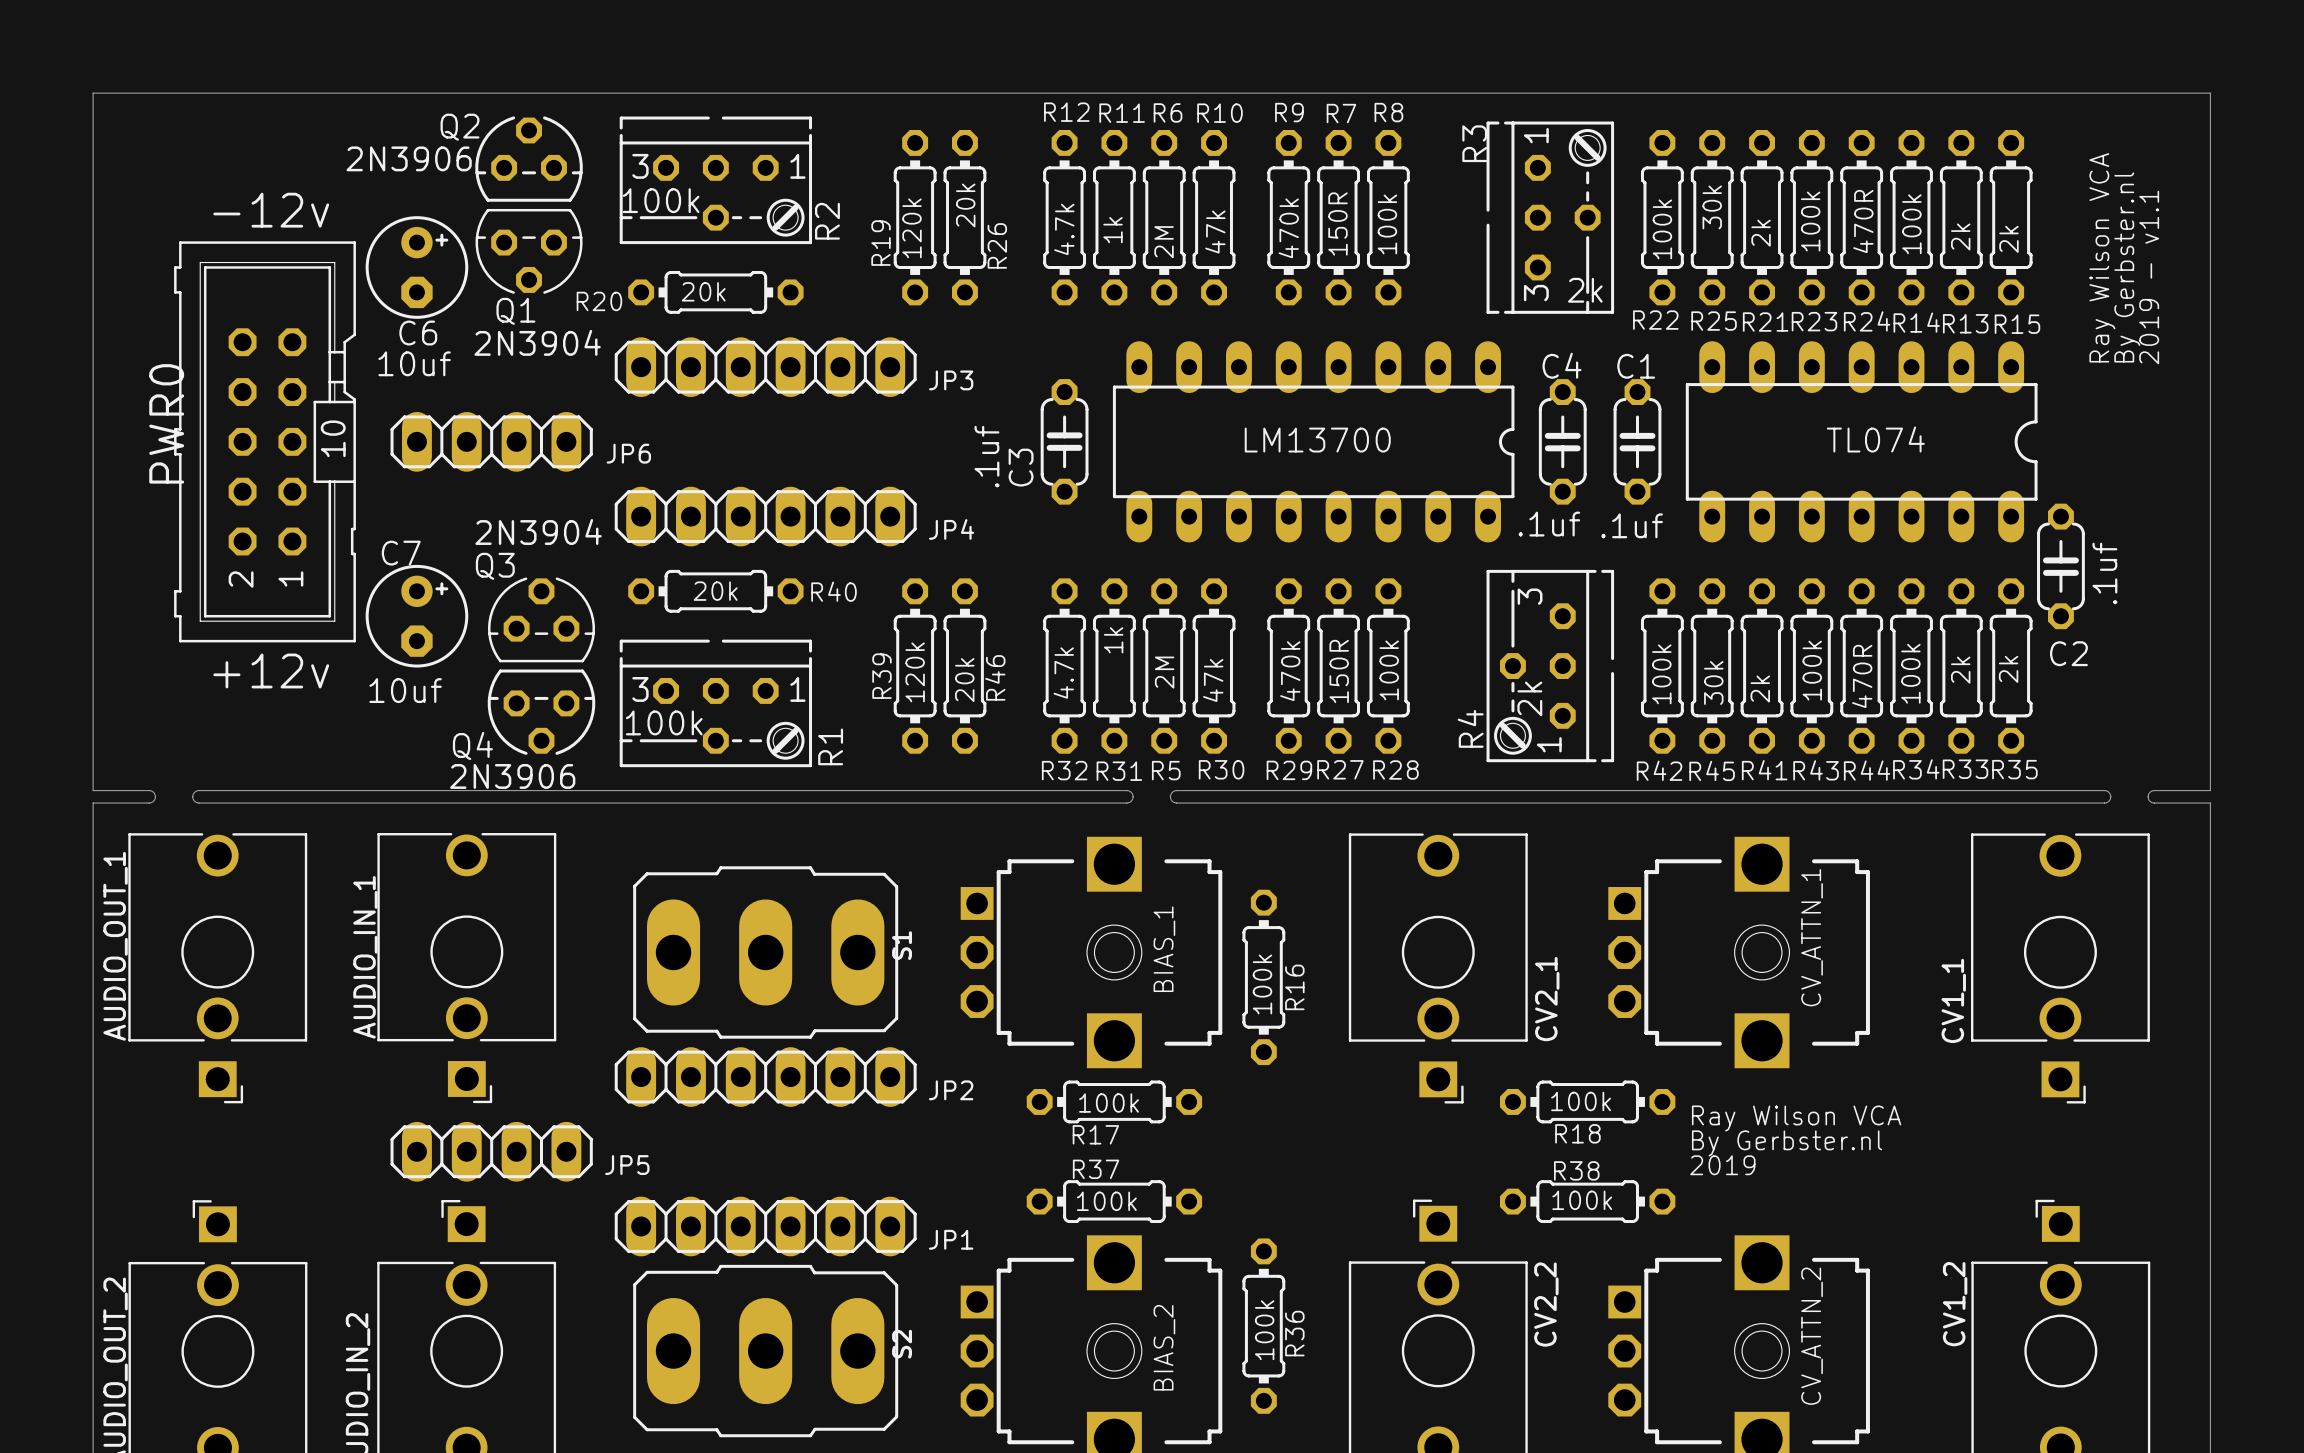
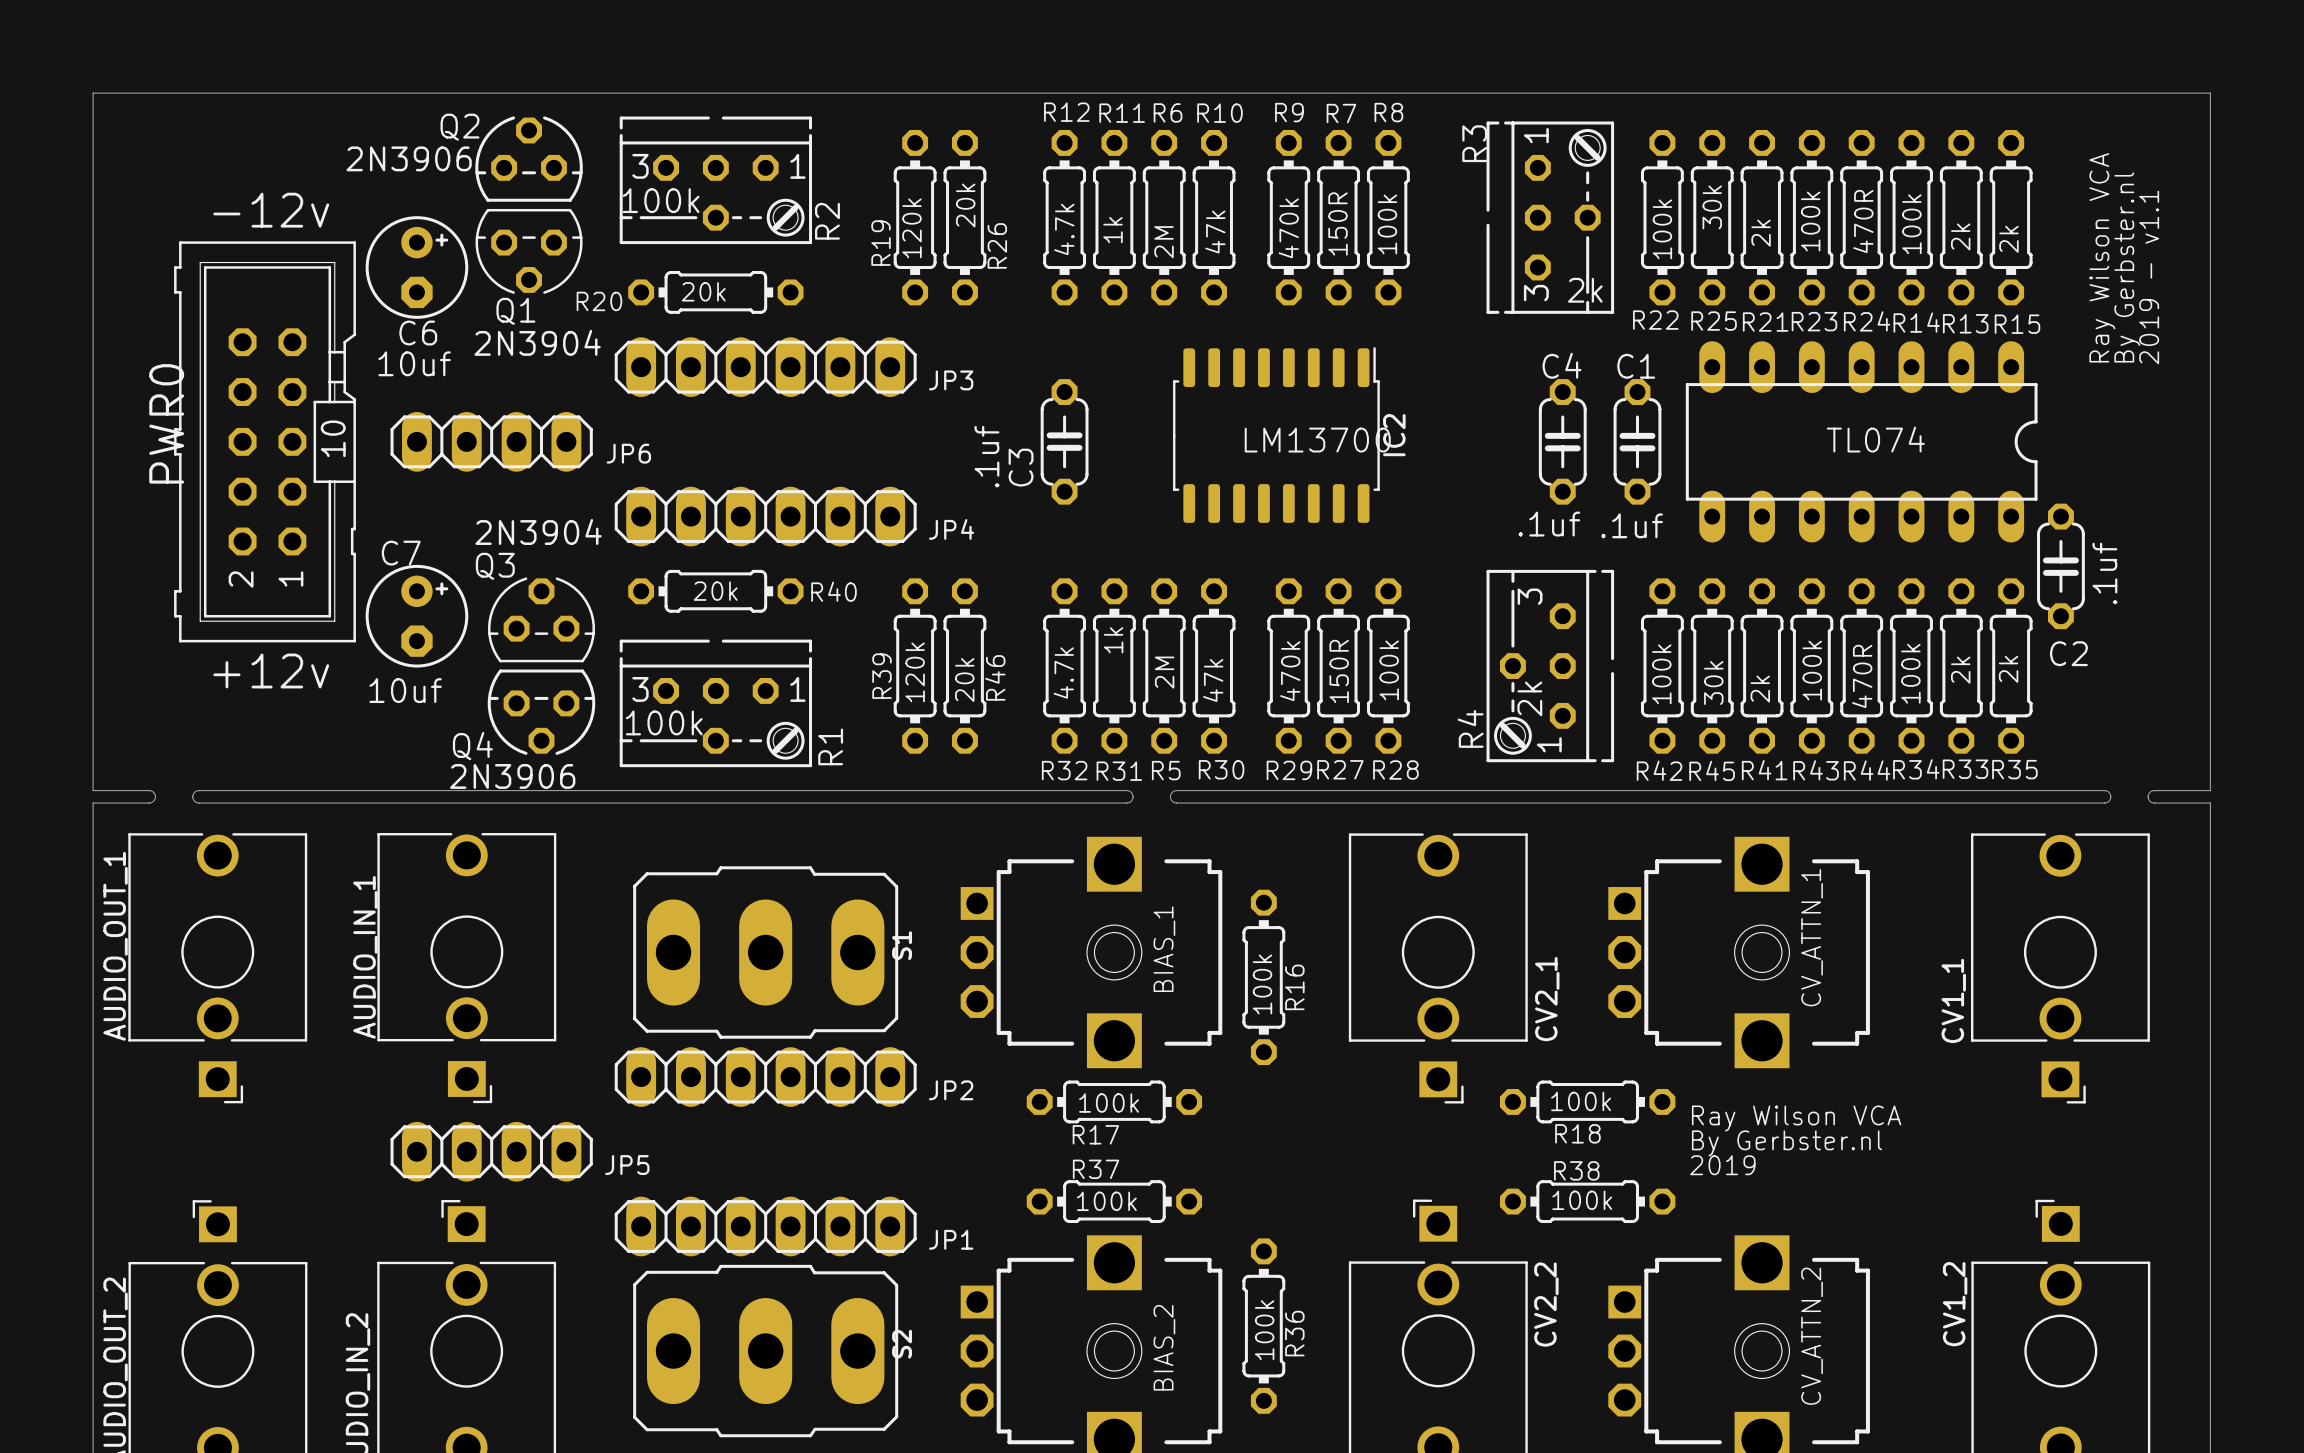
IC2: none -> (1276, 434)
part: (1313, 441) -> none

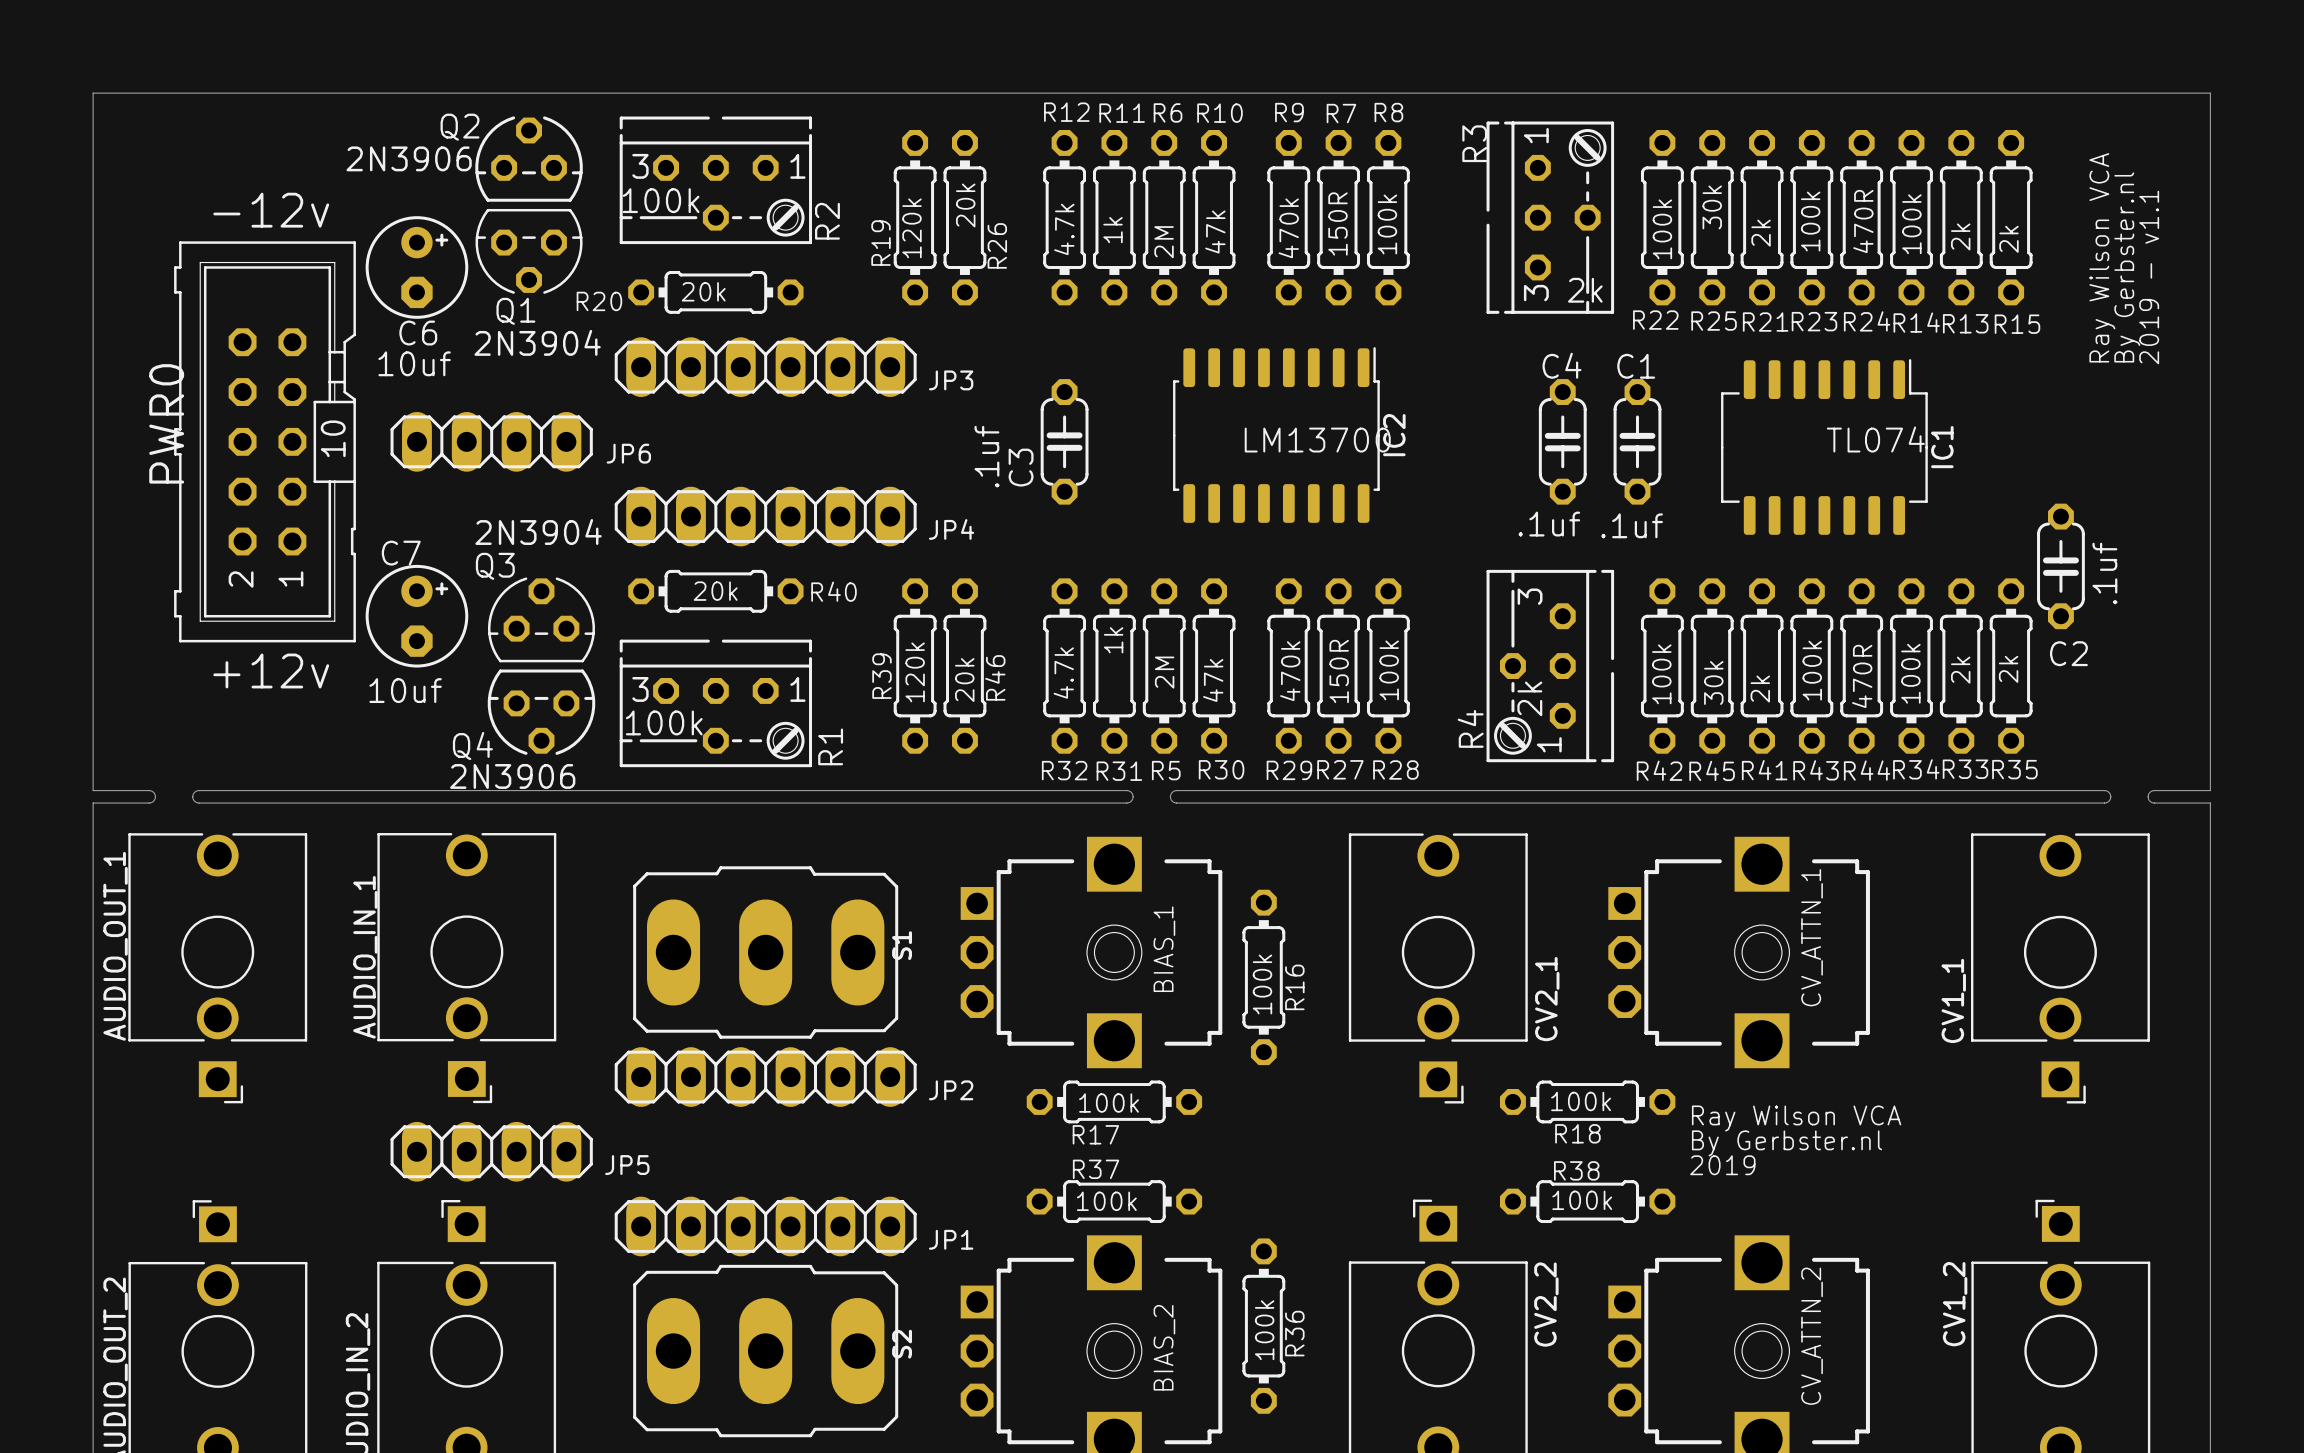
part: (1861, 441) -> none
IC1: none -> (1824, 446)

